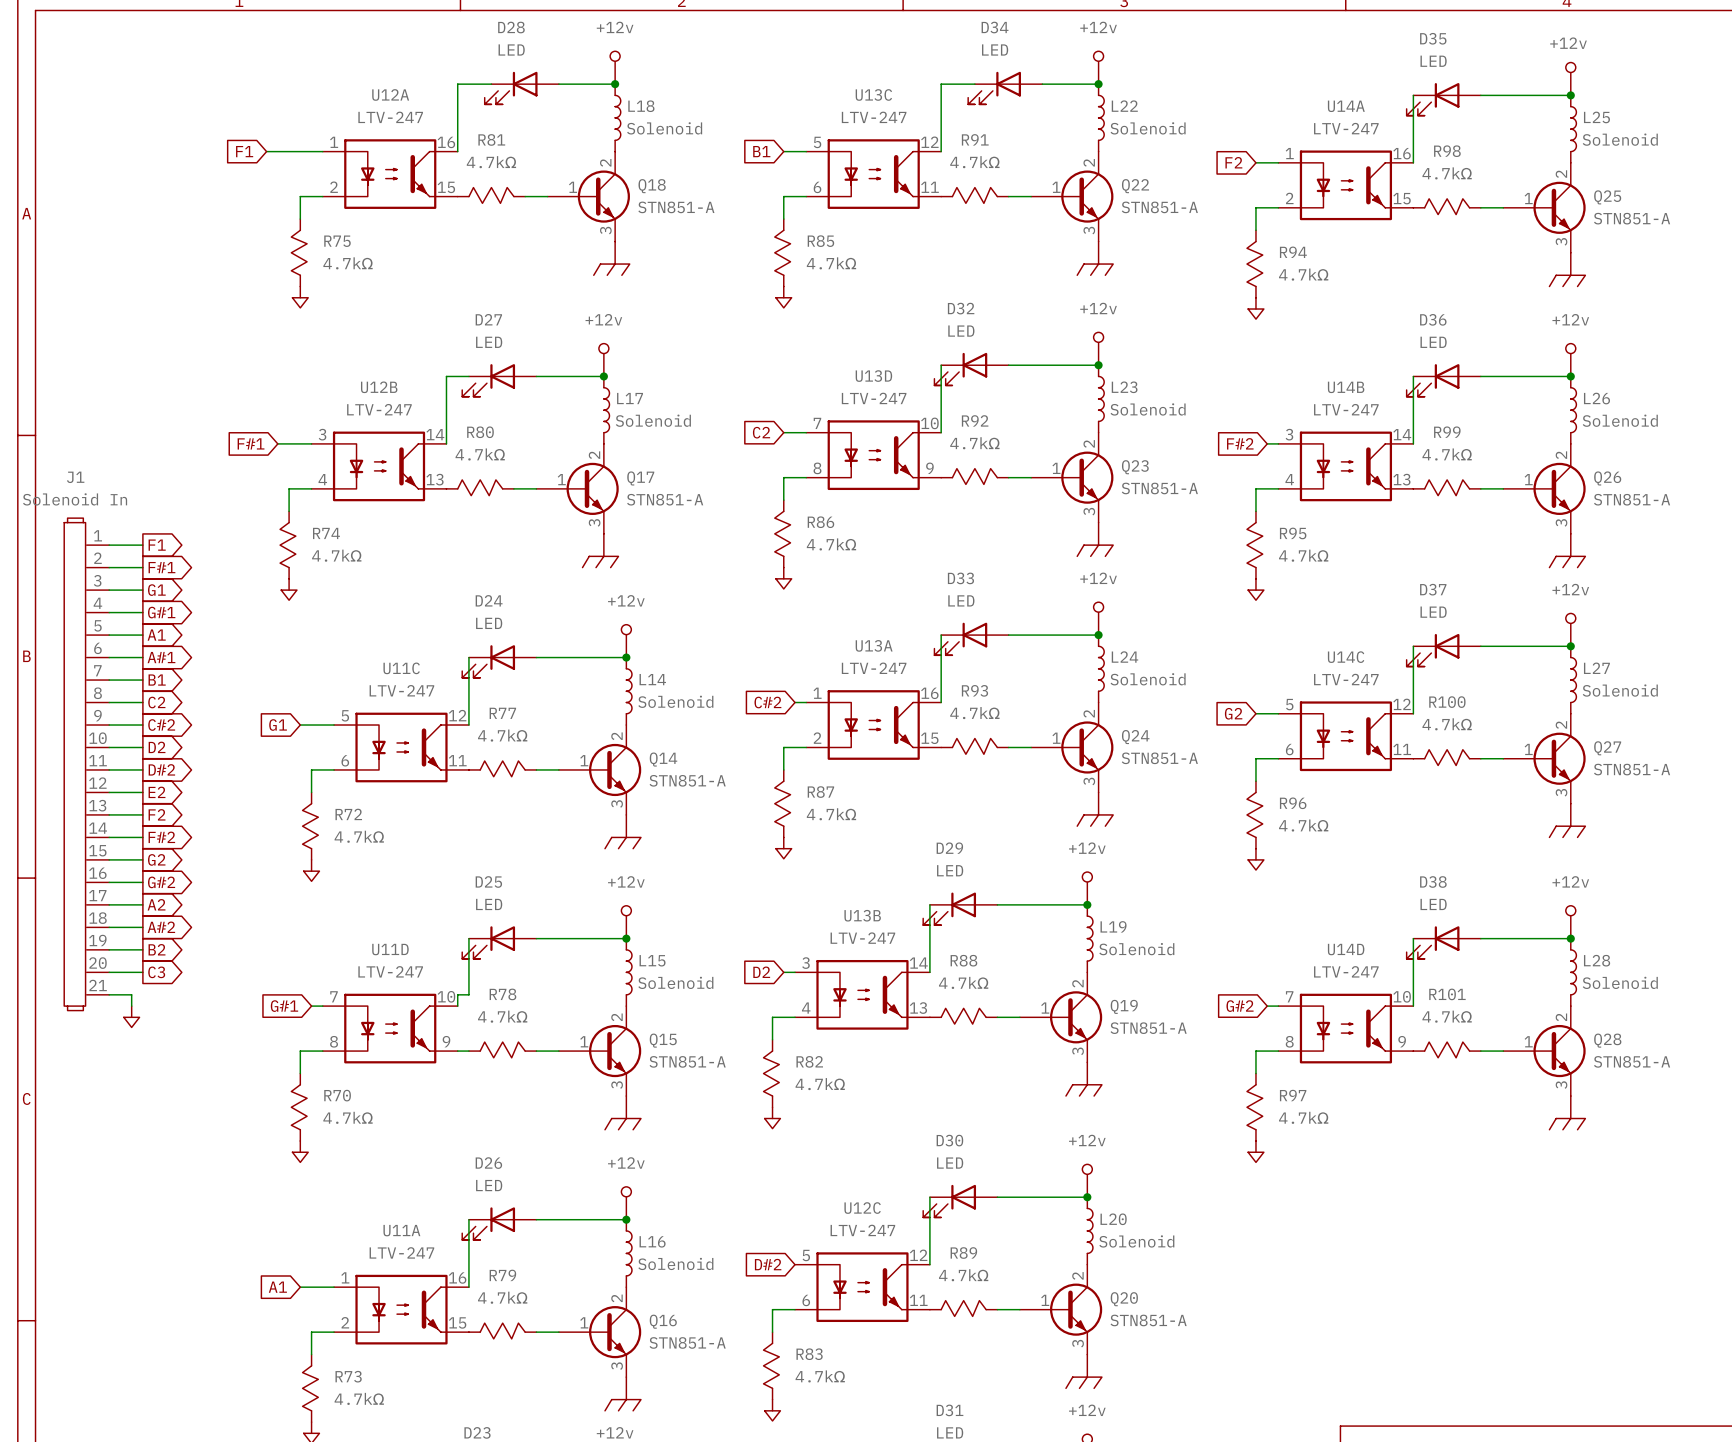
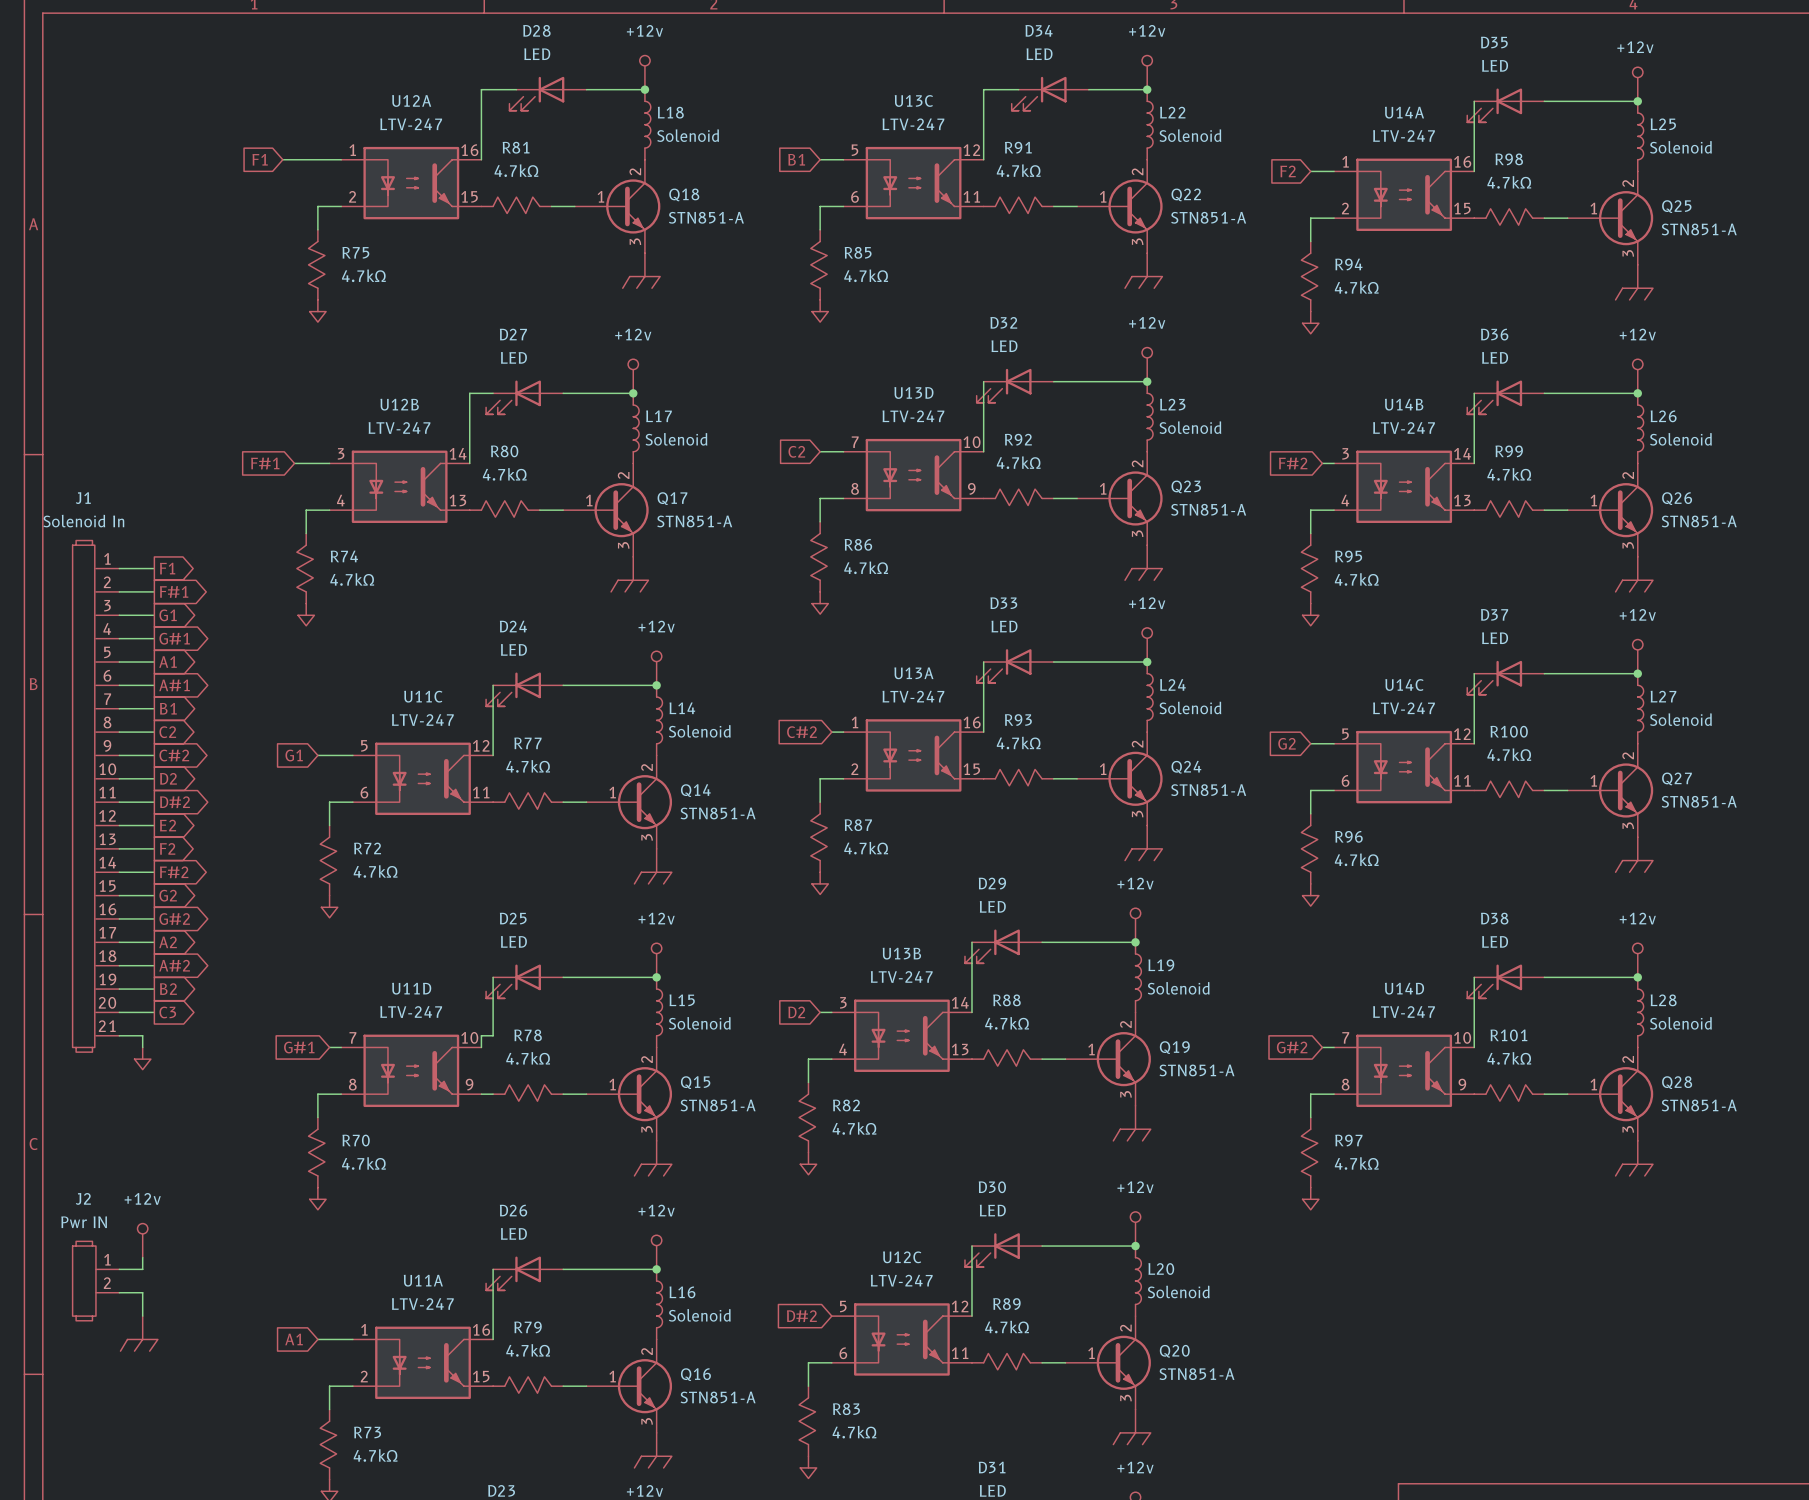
power symbol: none -> +12v (142, 1240)
wire: none -> (142, 1257) (142, 1269) (119, 1269)
J2: none -> Pwr IN (95, 1281)
wire: none -> (119, 1292) (142, 1292) (142, 1316)
power symbol: none -> (139, 1333)

